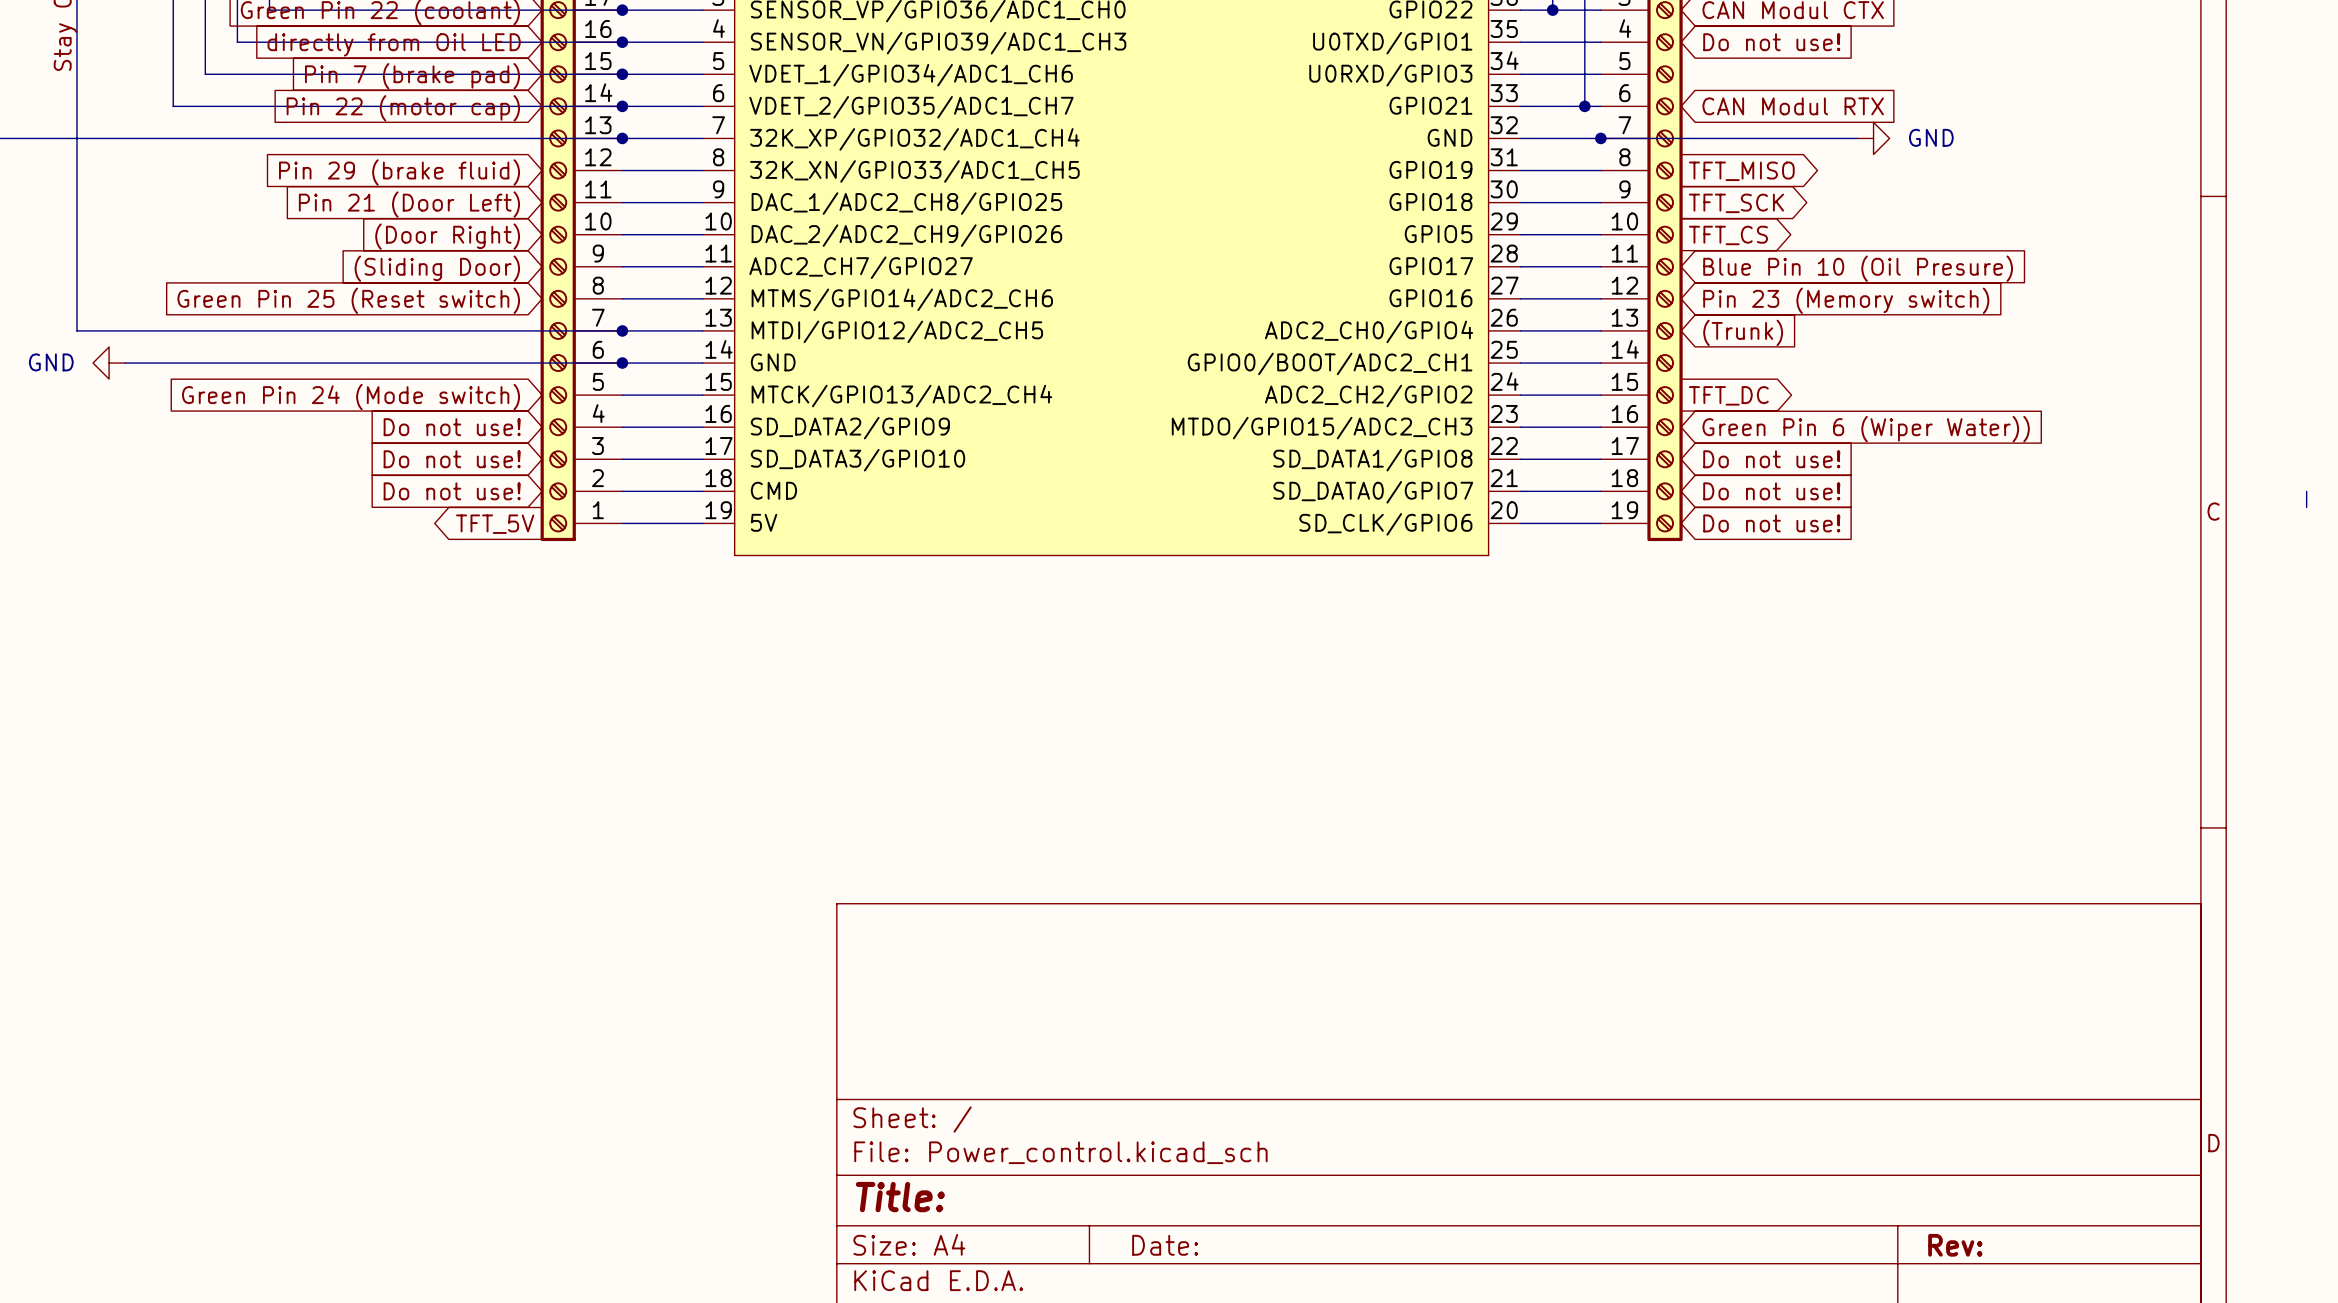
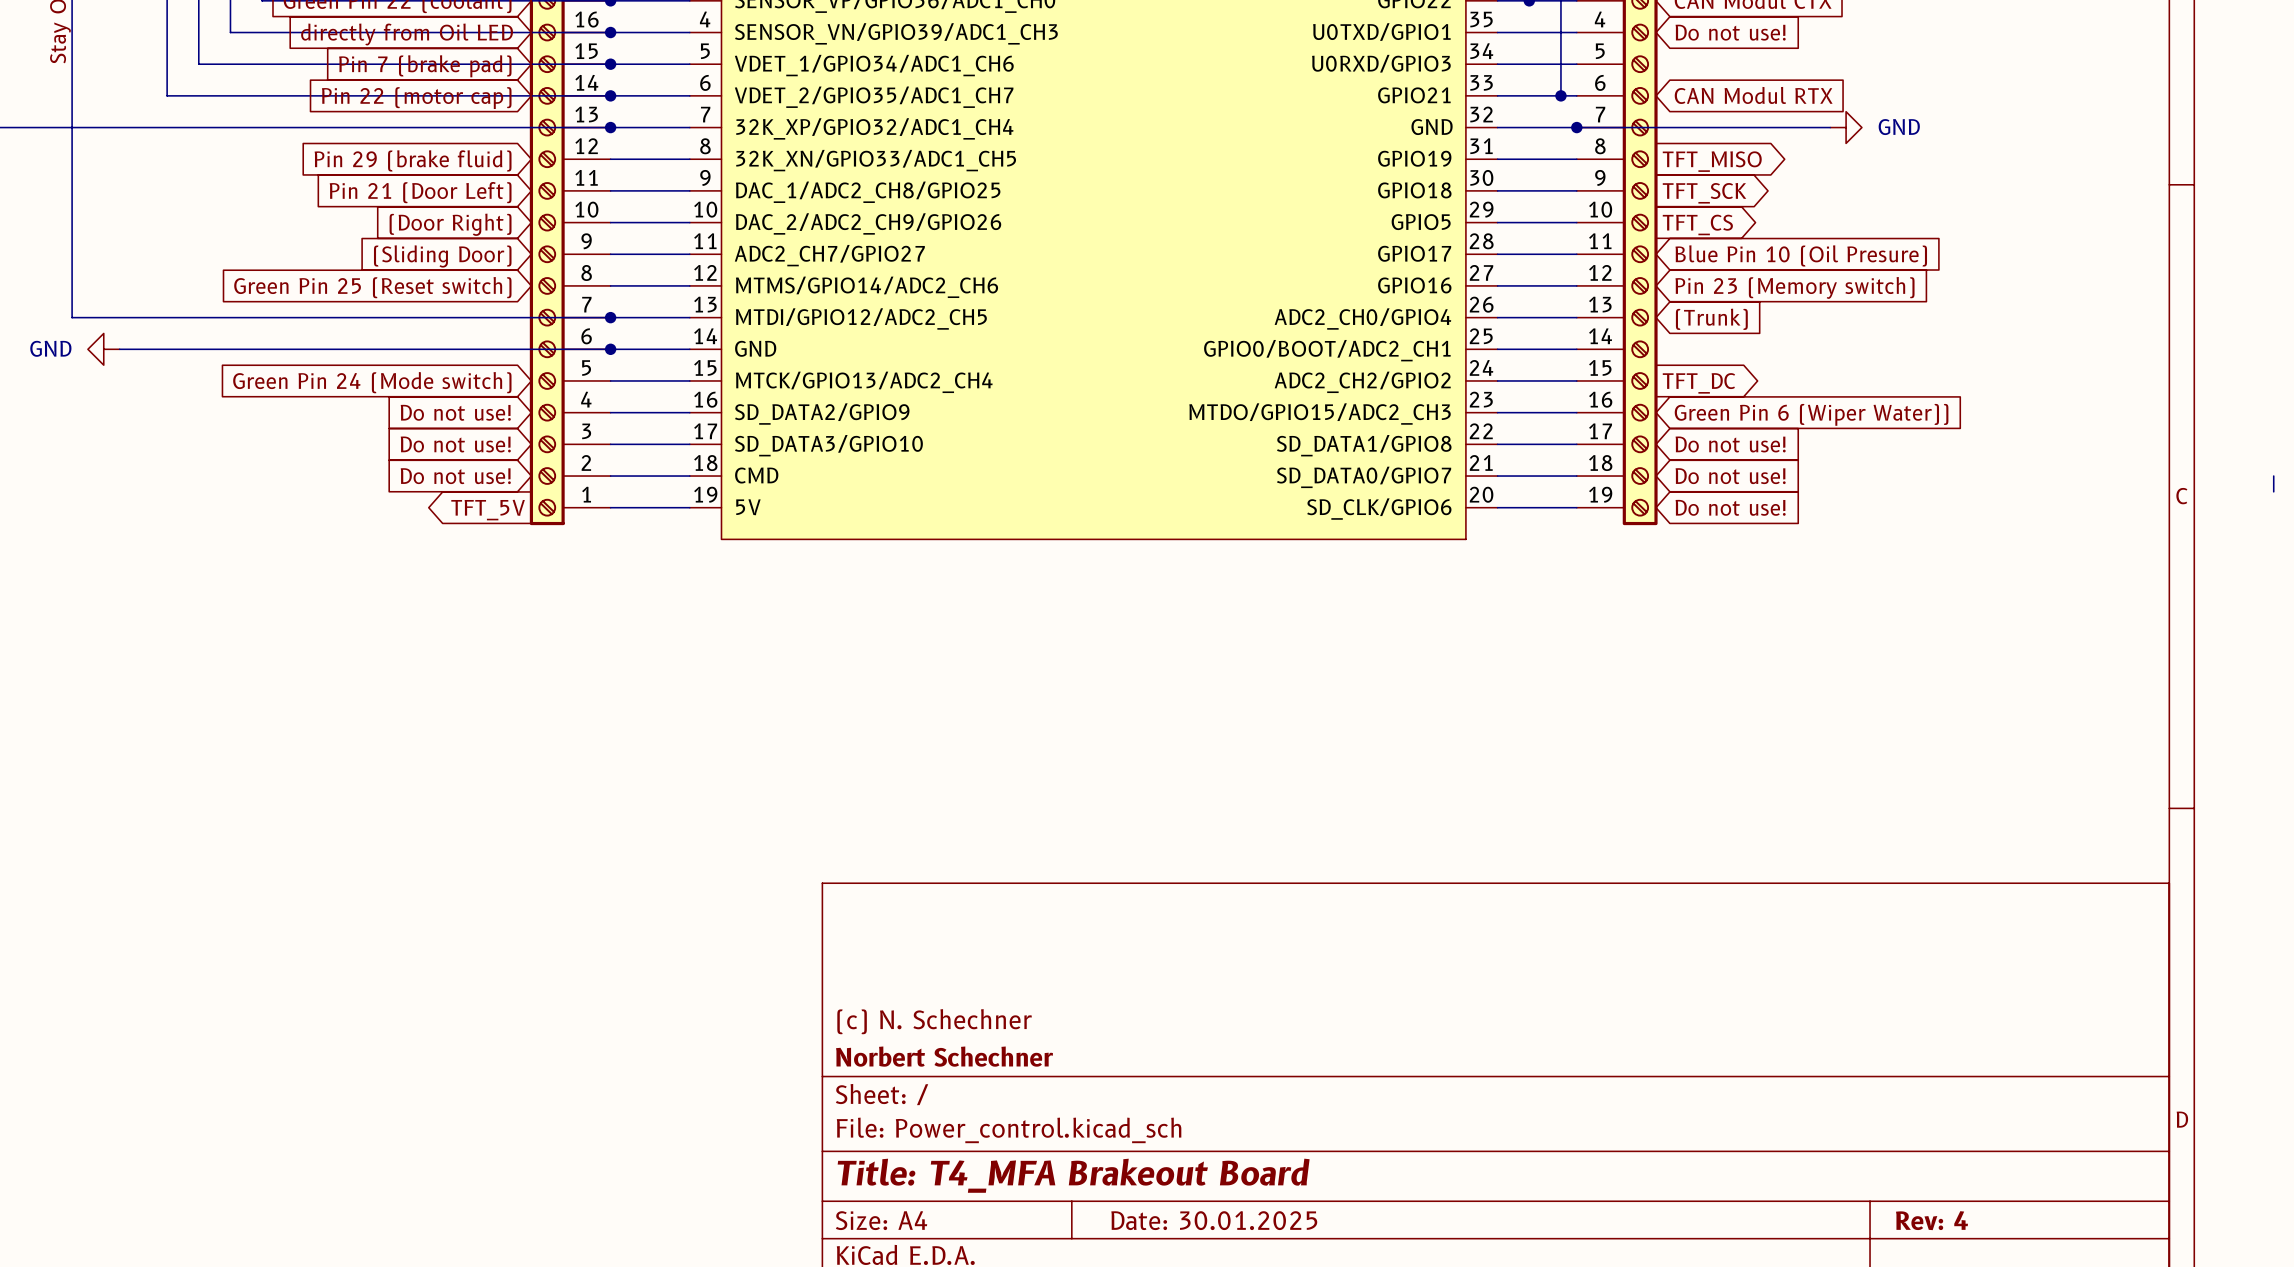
title block: none -> (c) N. Schechner (934, 1021)
title block: none -> Norbert Schechner (944, 1056)
title block: Title: (900, 1197) -> Title: T4_MFA Brakeout Board (1073, 1175)
title block: Date: (1165, 1245) -> Date: 30.01.2025 (1214, 1220)
title block: Rev: (1955, 1245) -> Rev: 4 (1931, 1220)

